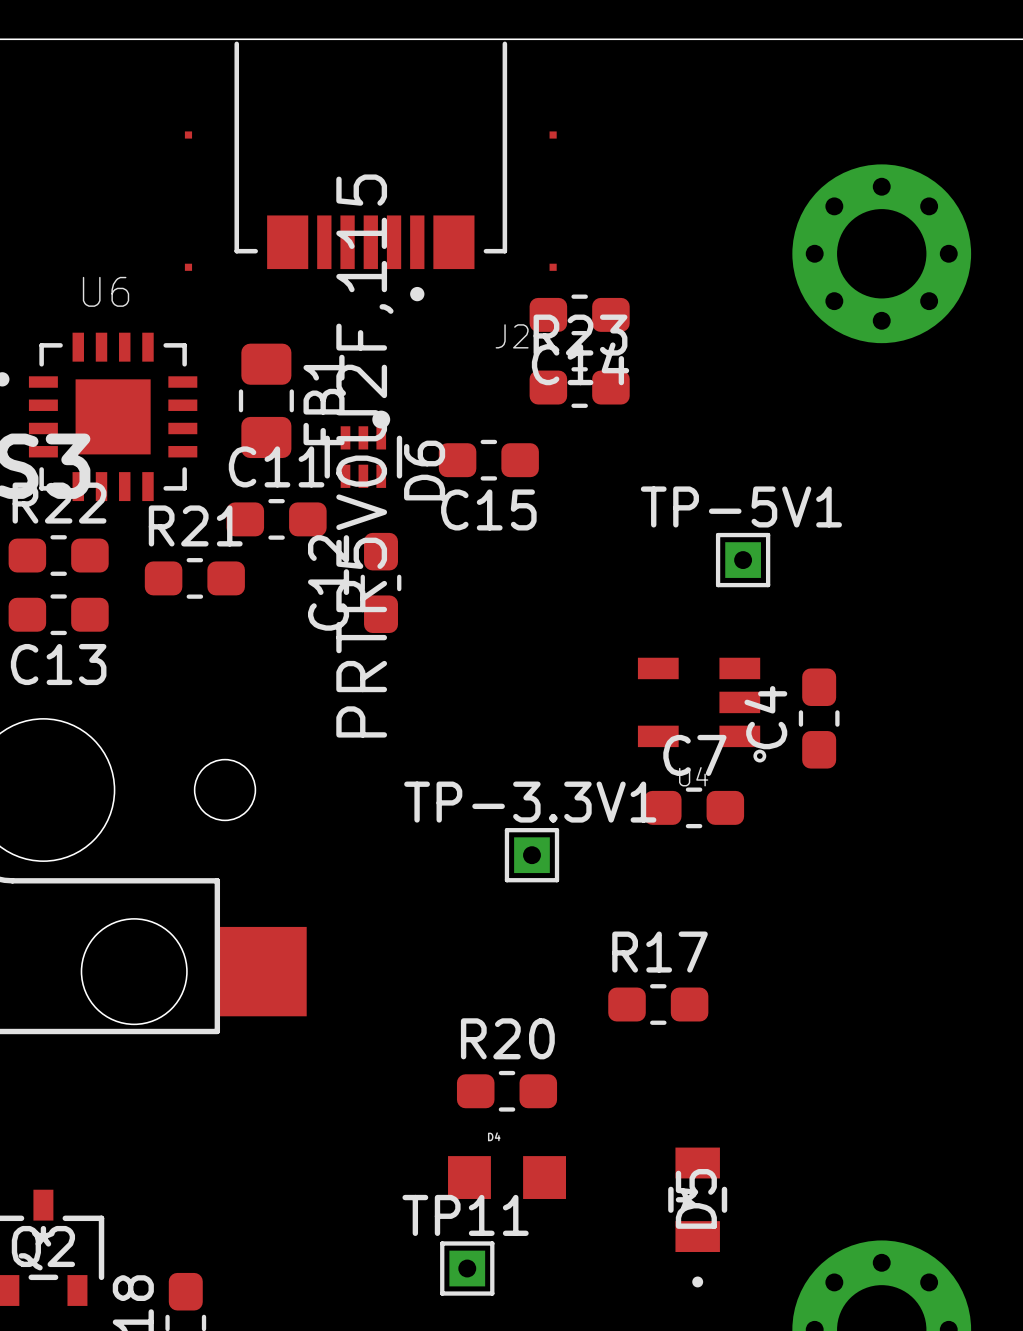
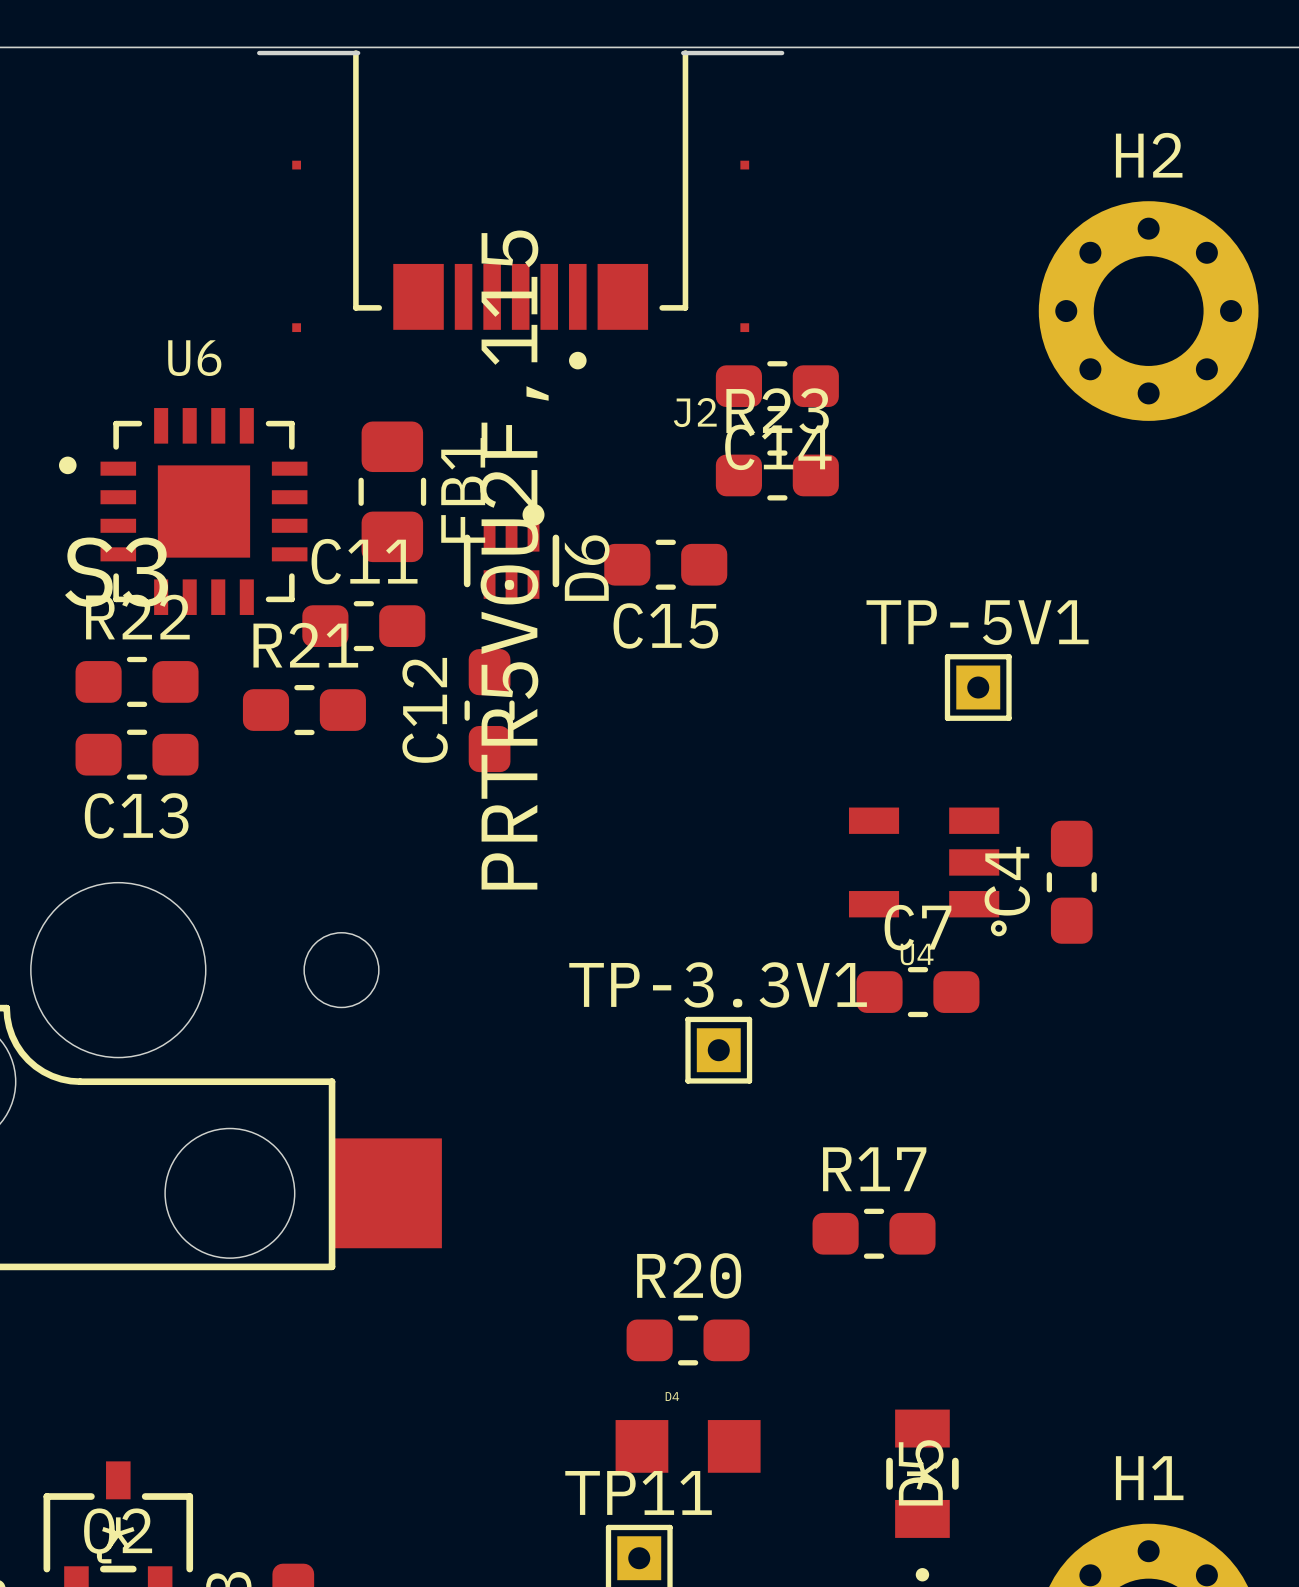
J2 footprint: [184, 41, 557, 302] -> [257, 50, 785, 370]
H2 name: none -> H2 (1149, 155)
C11 position: (276, 519) -> (363, 626)
C12 position: (381, 582) -> (489, 710)
H1 name: none -> H1 (1149, 1478)

